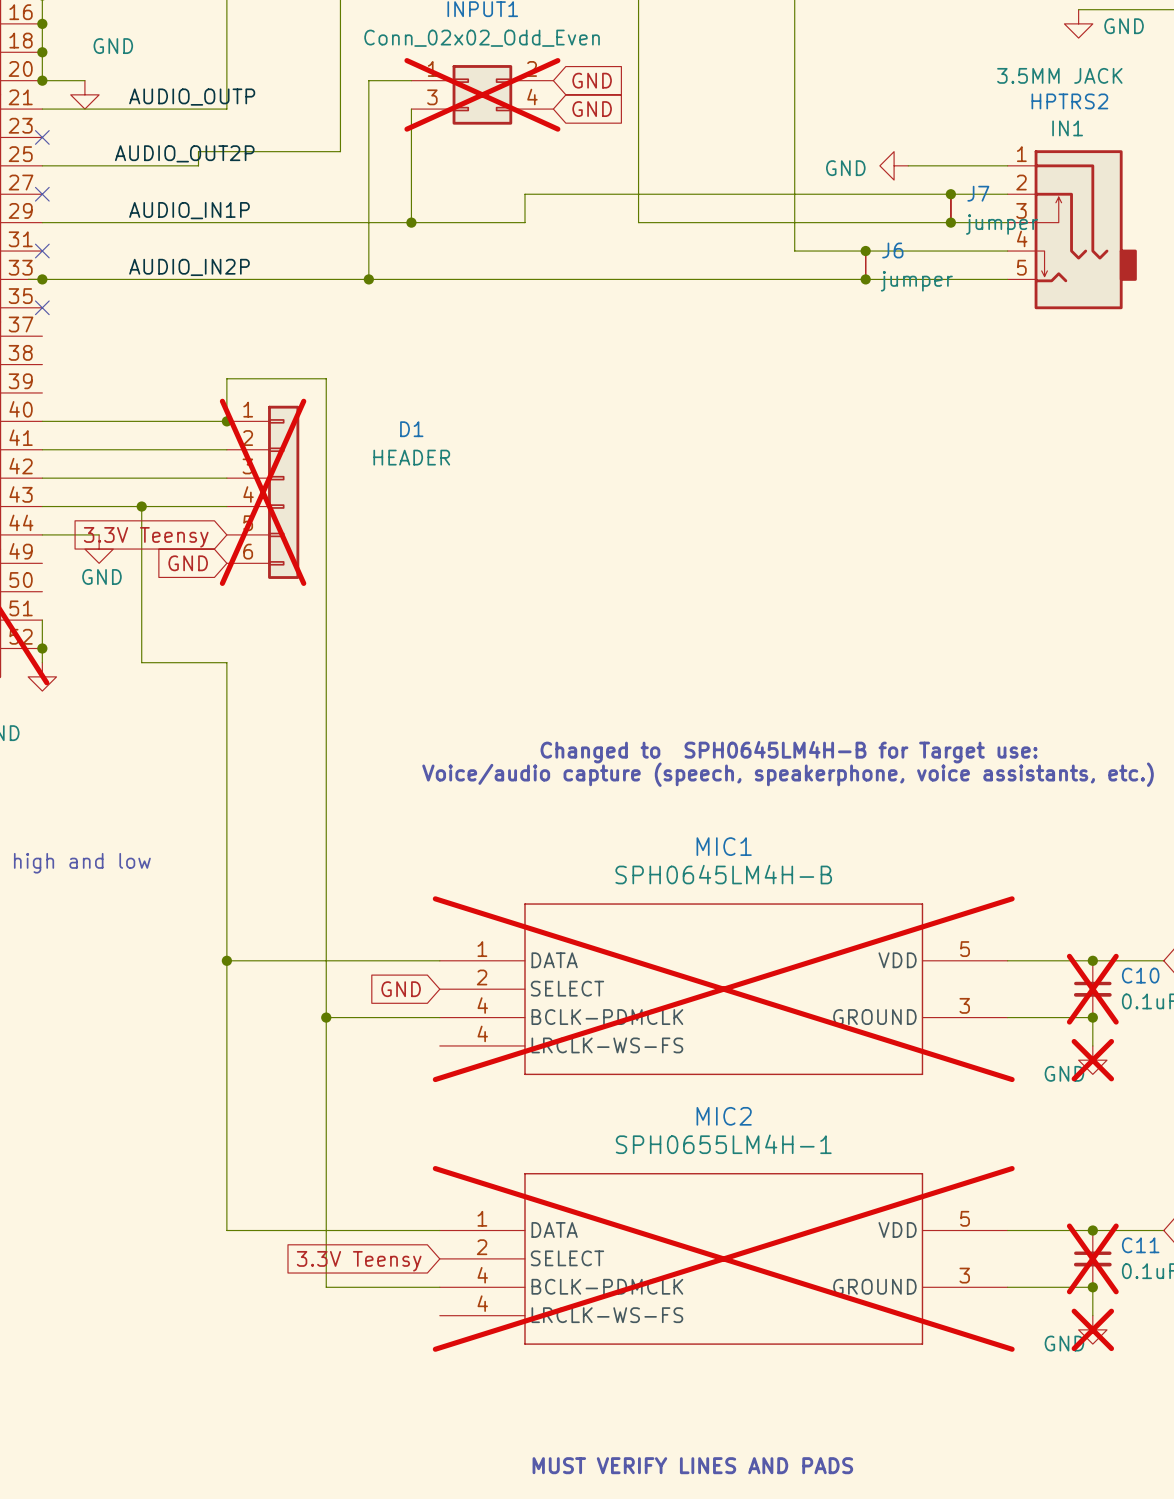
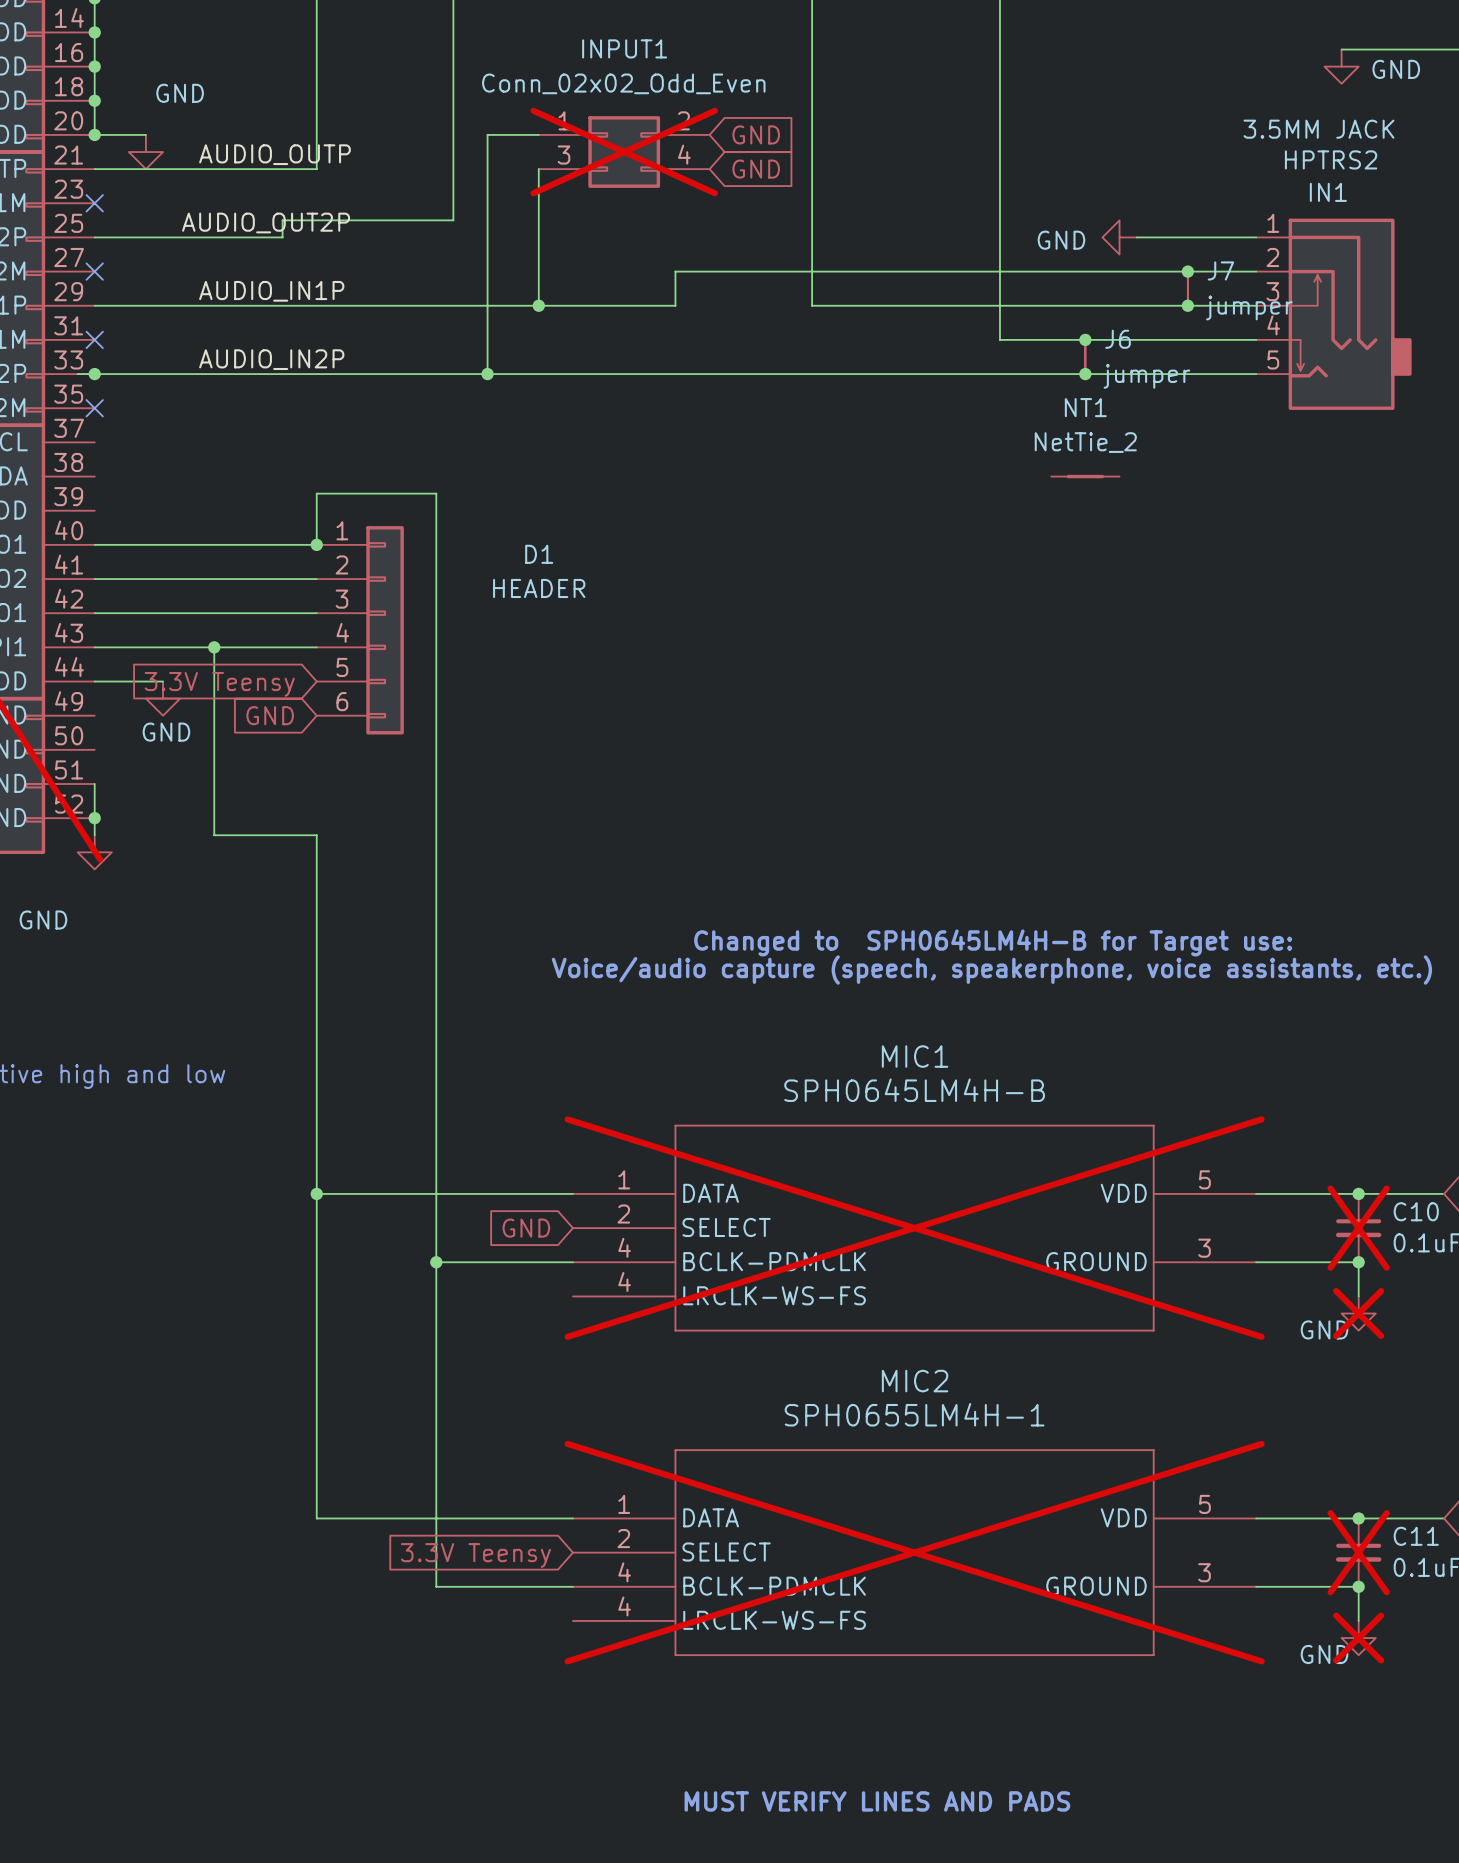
NT1: none -> NetTie_2 (1085, 476)
D1 do-not-place cross: (263, 492) -> none

